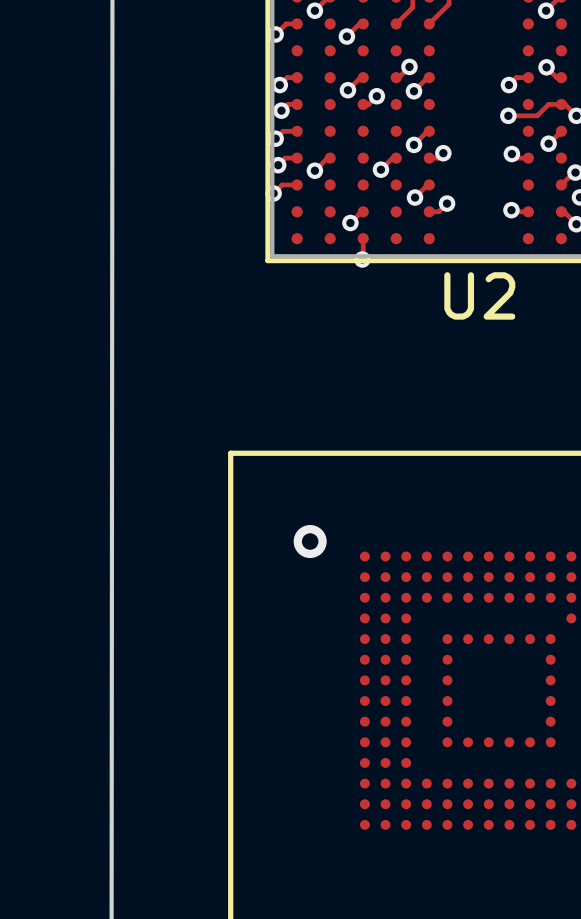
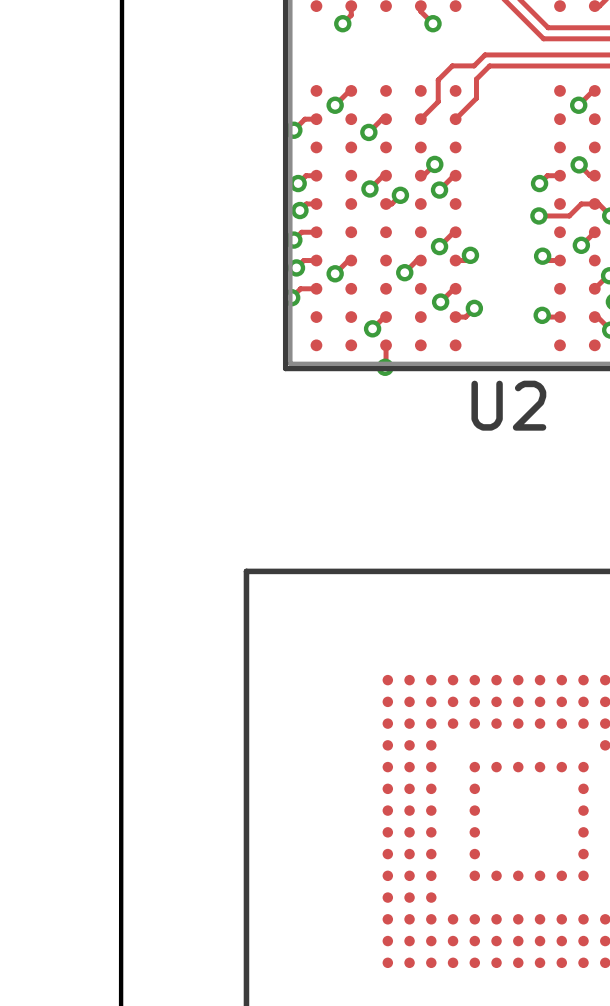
via: (310, 541) -> none

